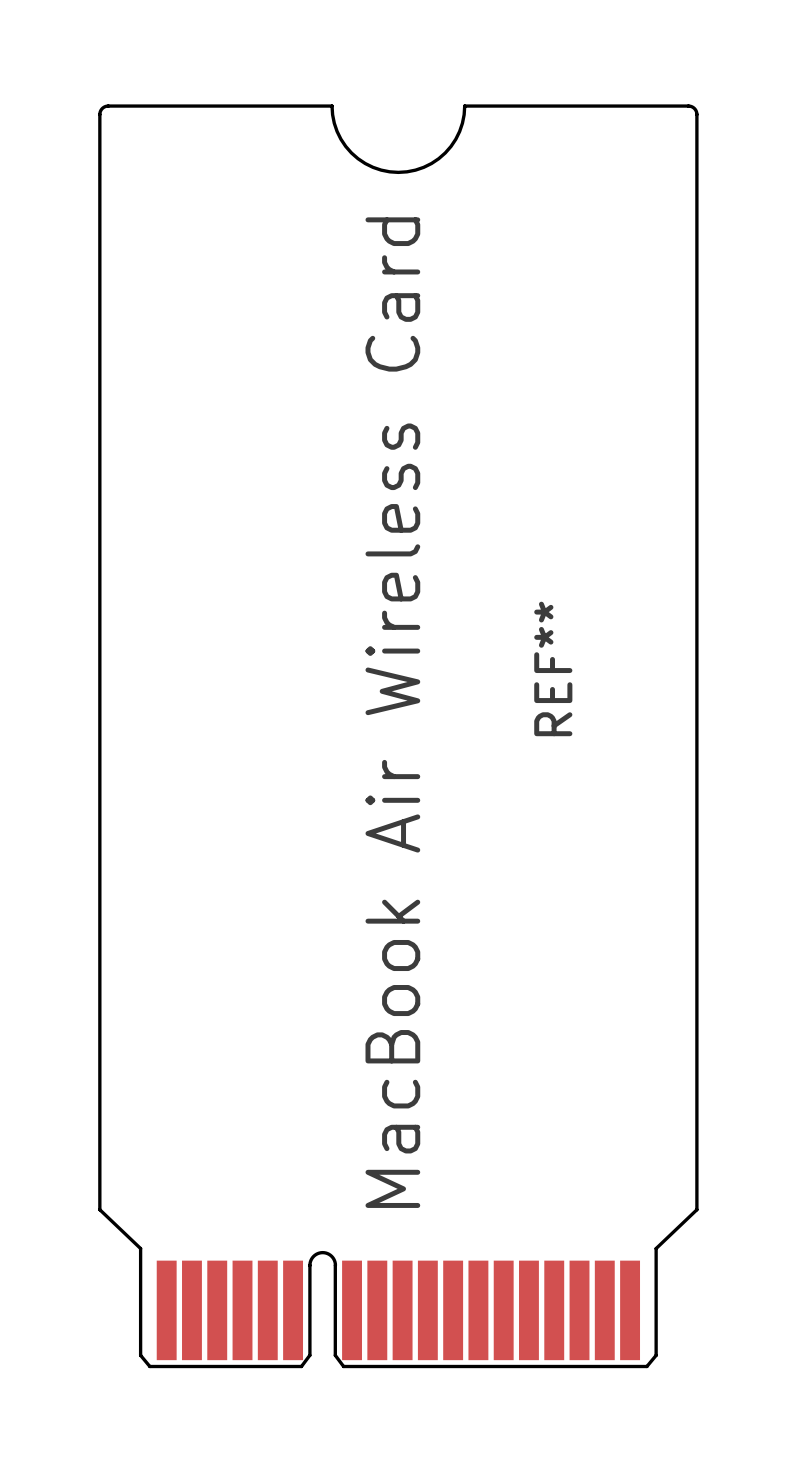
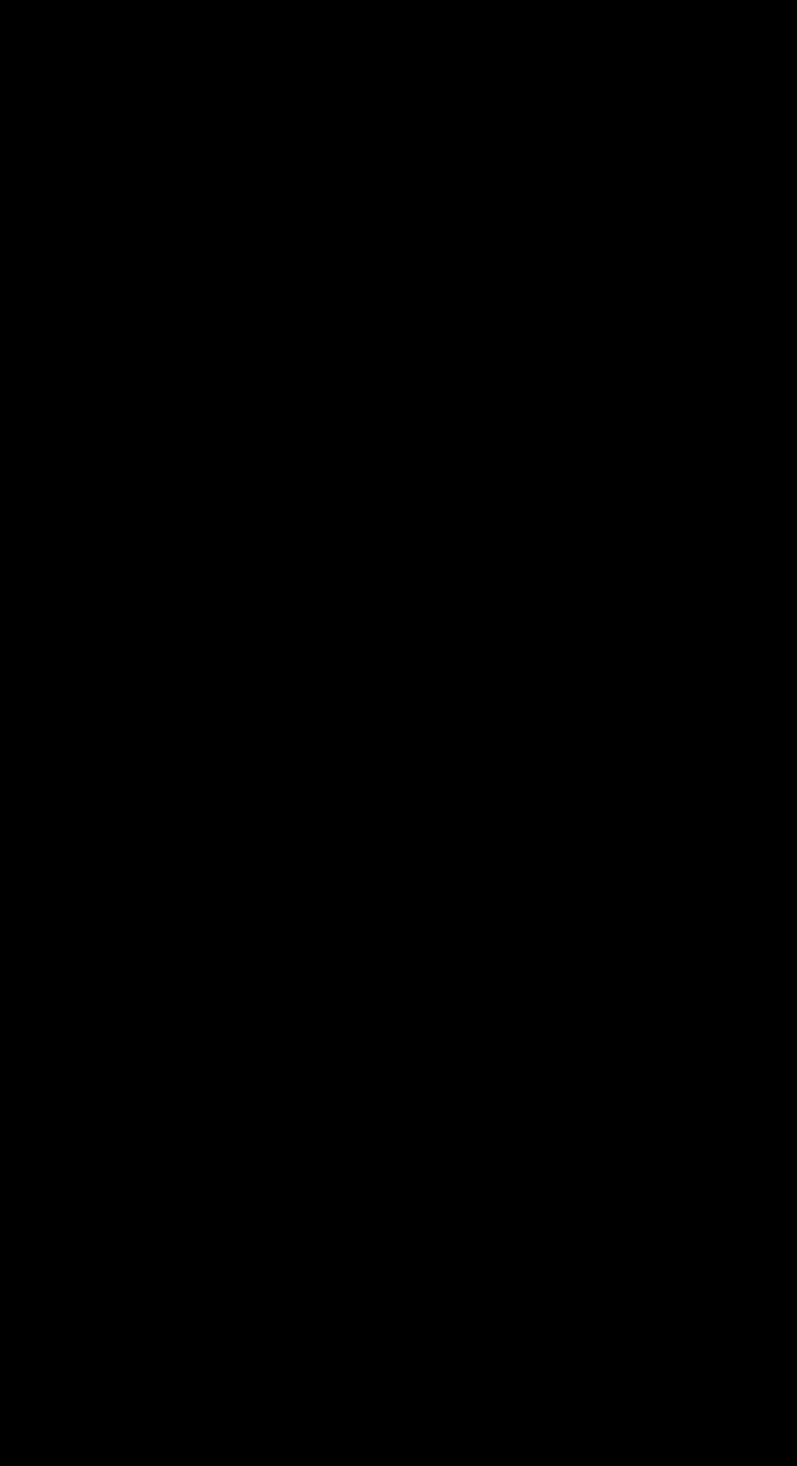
REF**: (398, 736) -> none

